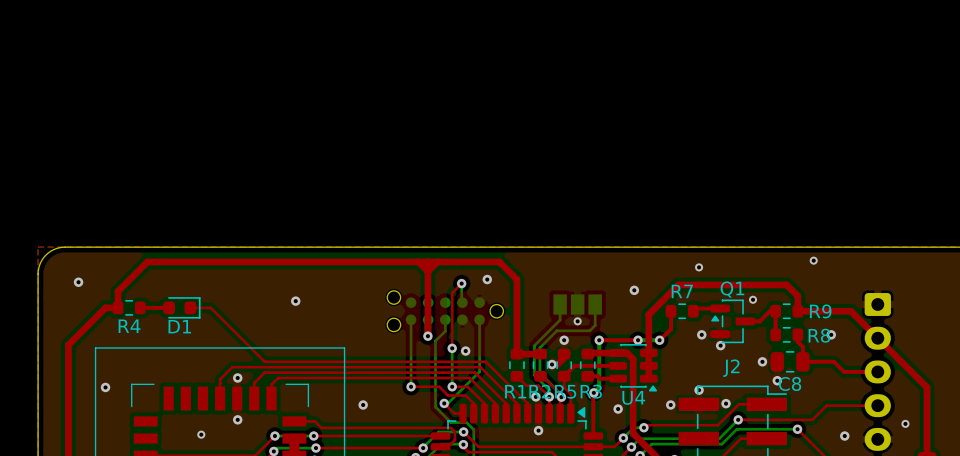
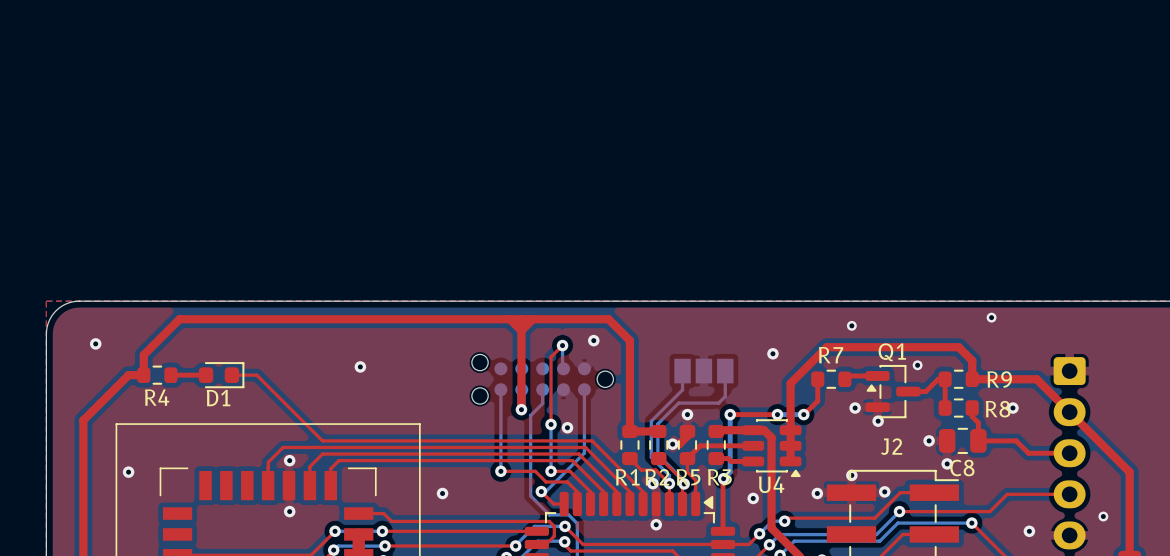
via: (577, 321) -> none
via: (201, 434) -> none

